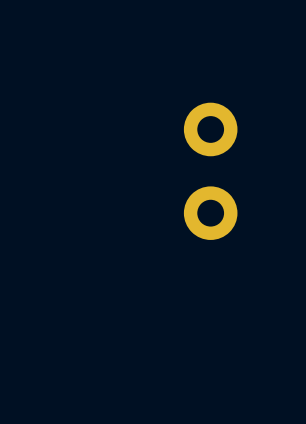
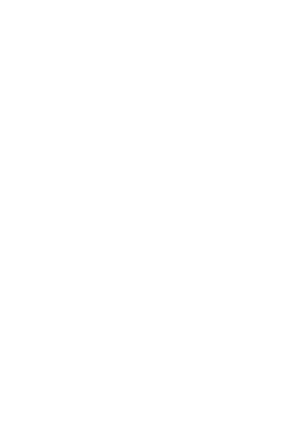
part: (210, 171) -> none

